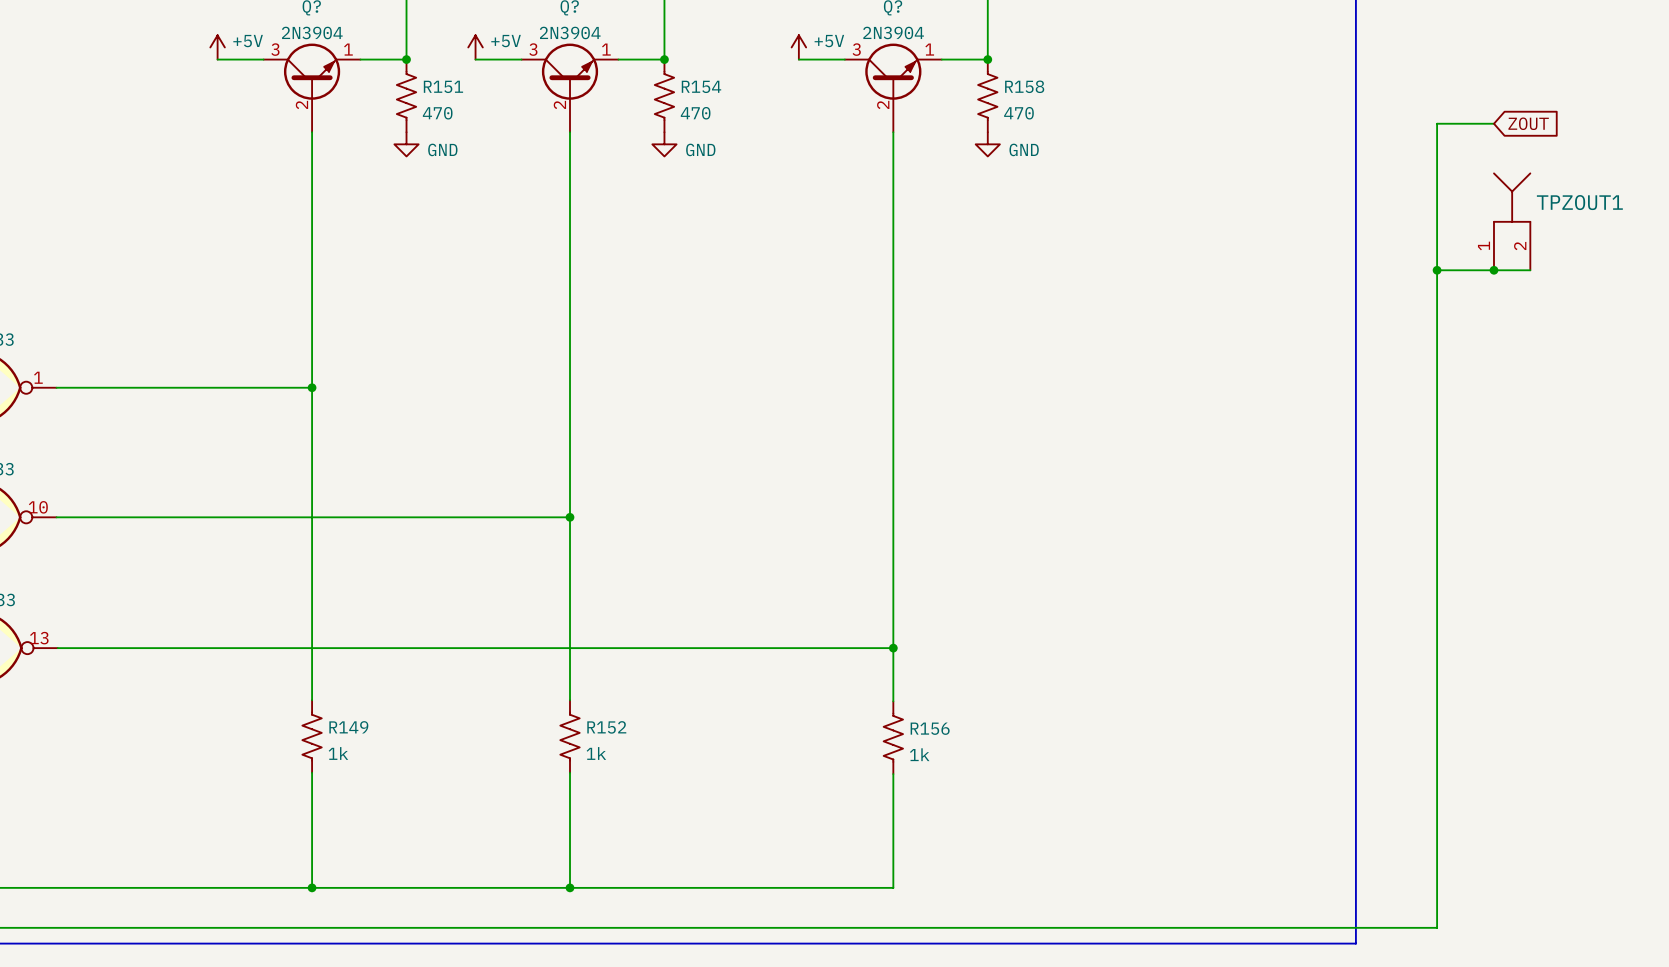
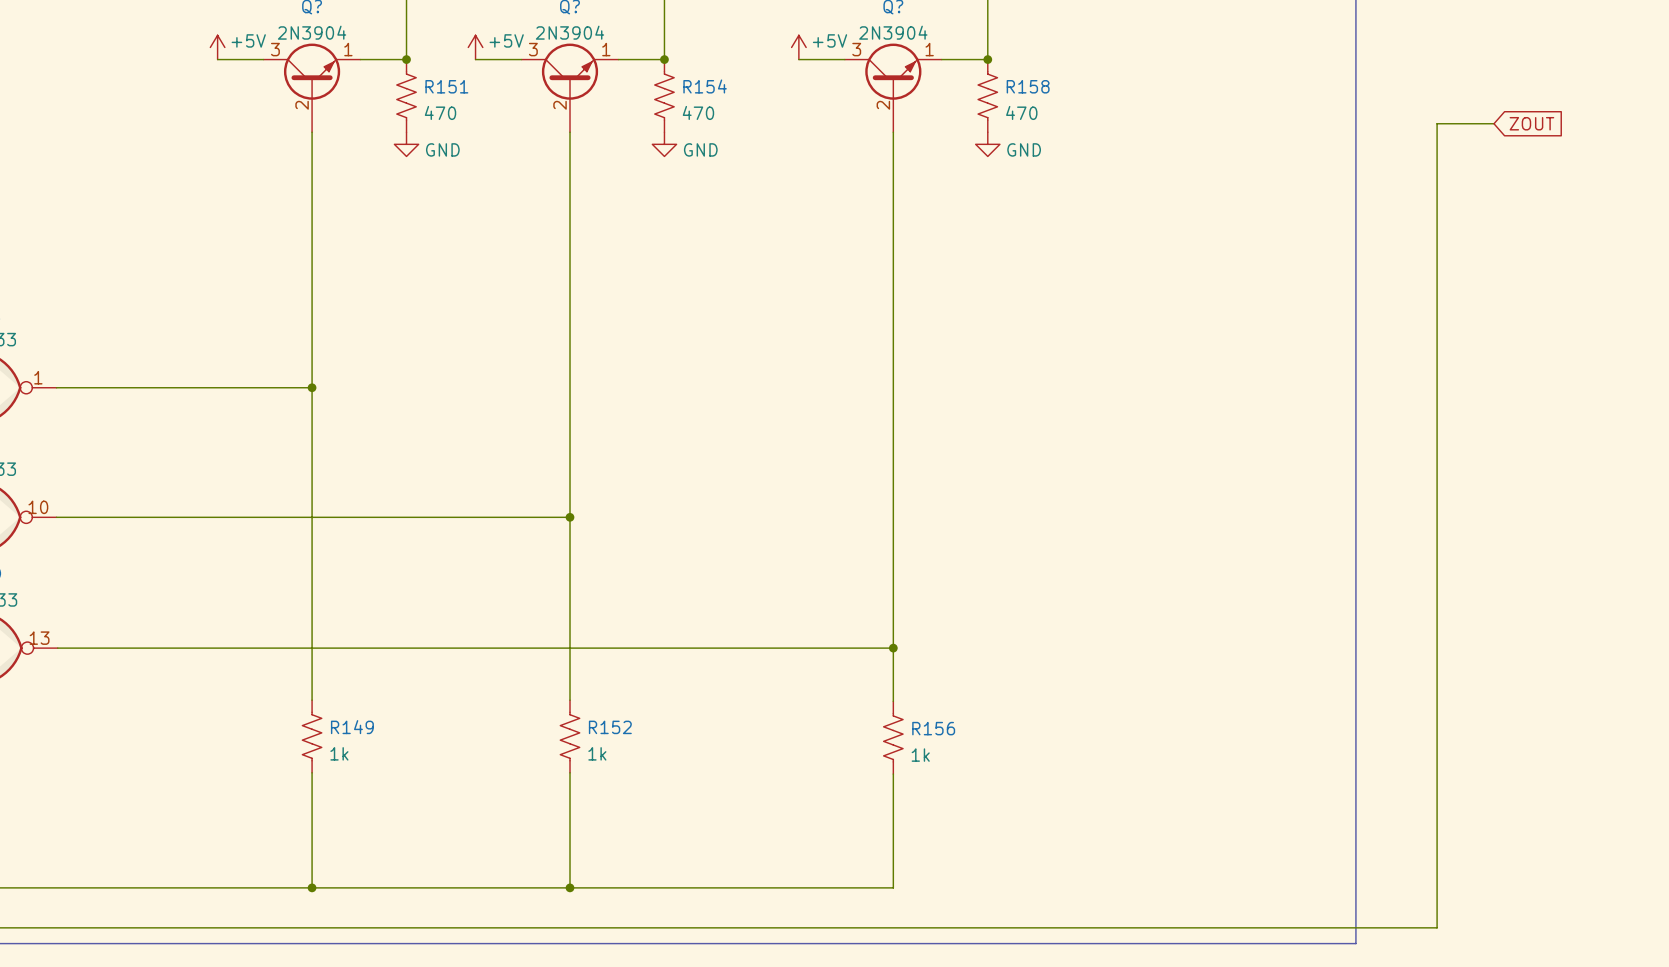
TPZOUT1: (1512, 221) -> none
wire: (1437, 270) (1530, 270) -> none
junction: (1437, 270) -> none
junction: (1493, 270) -> none

